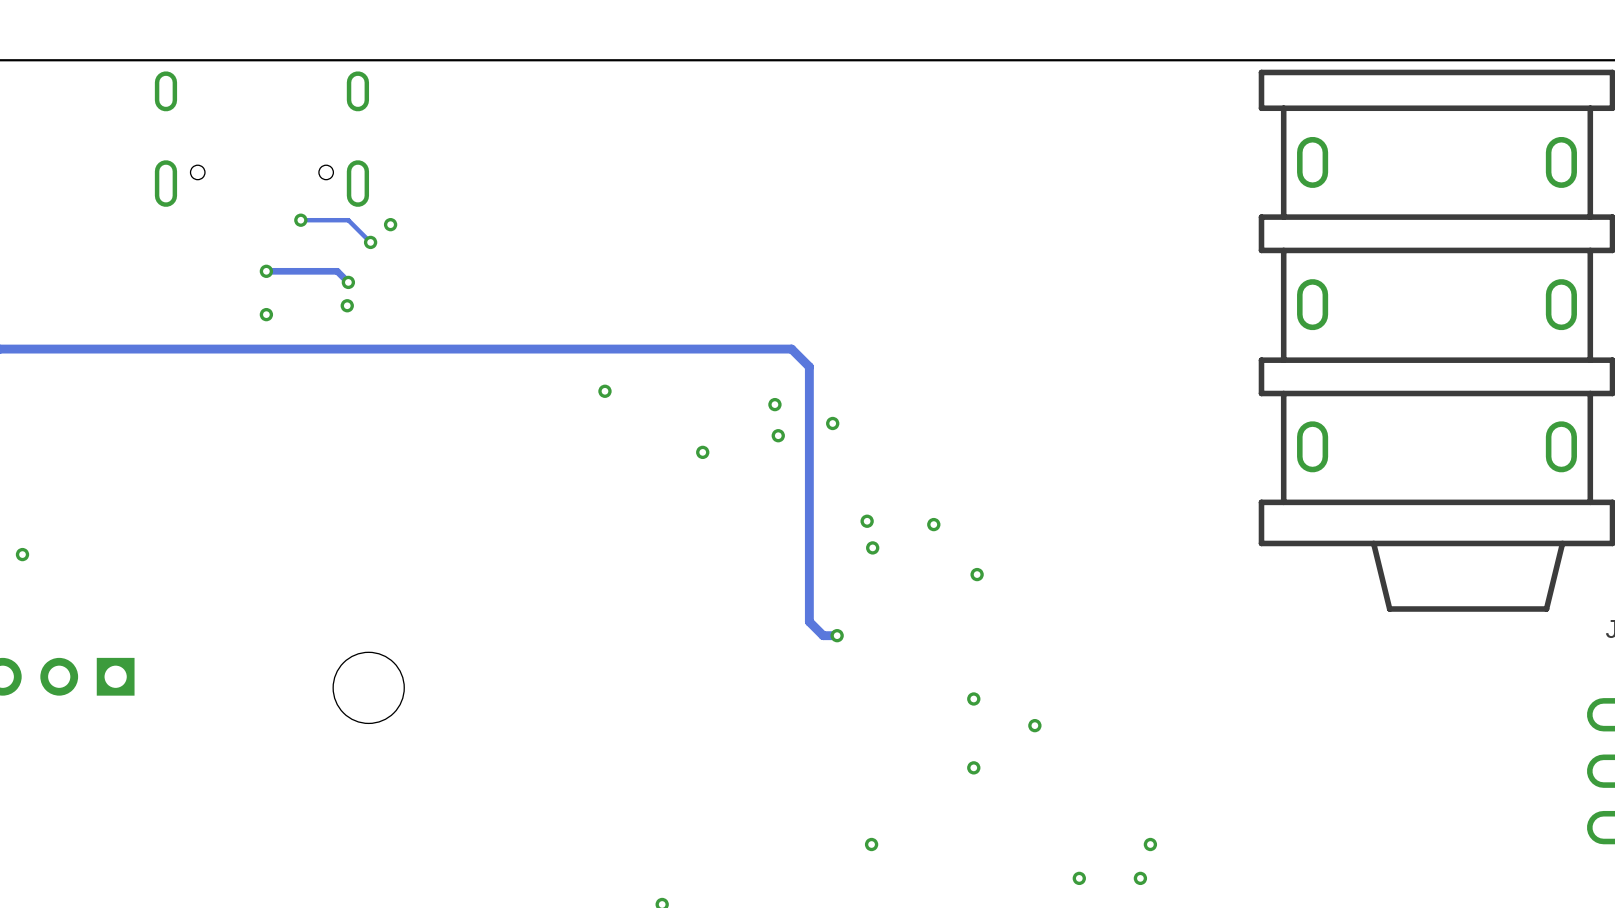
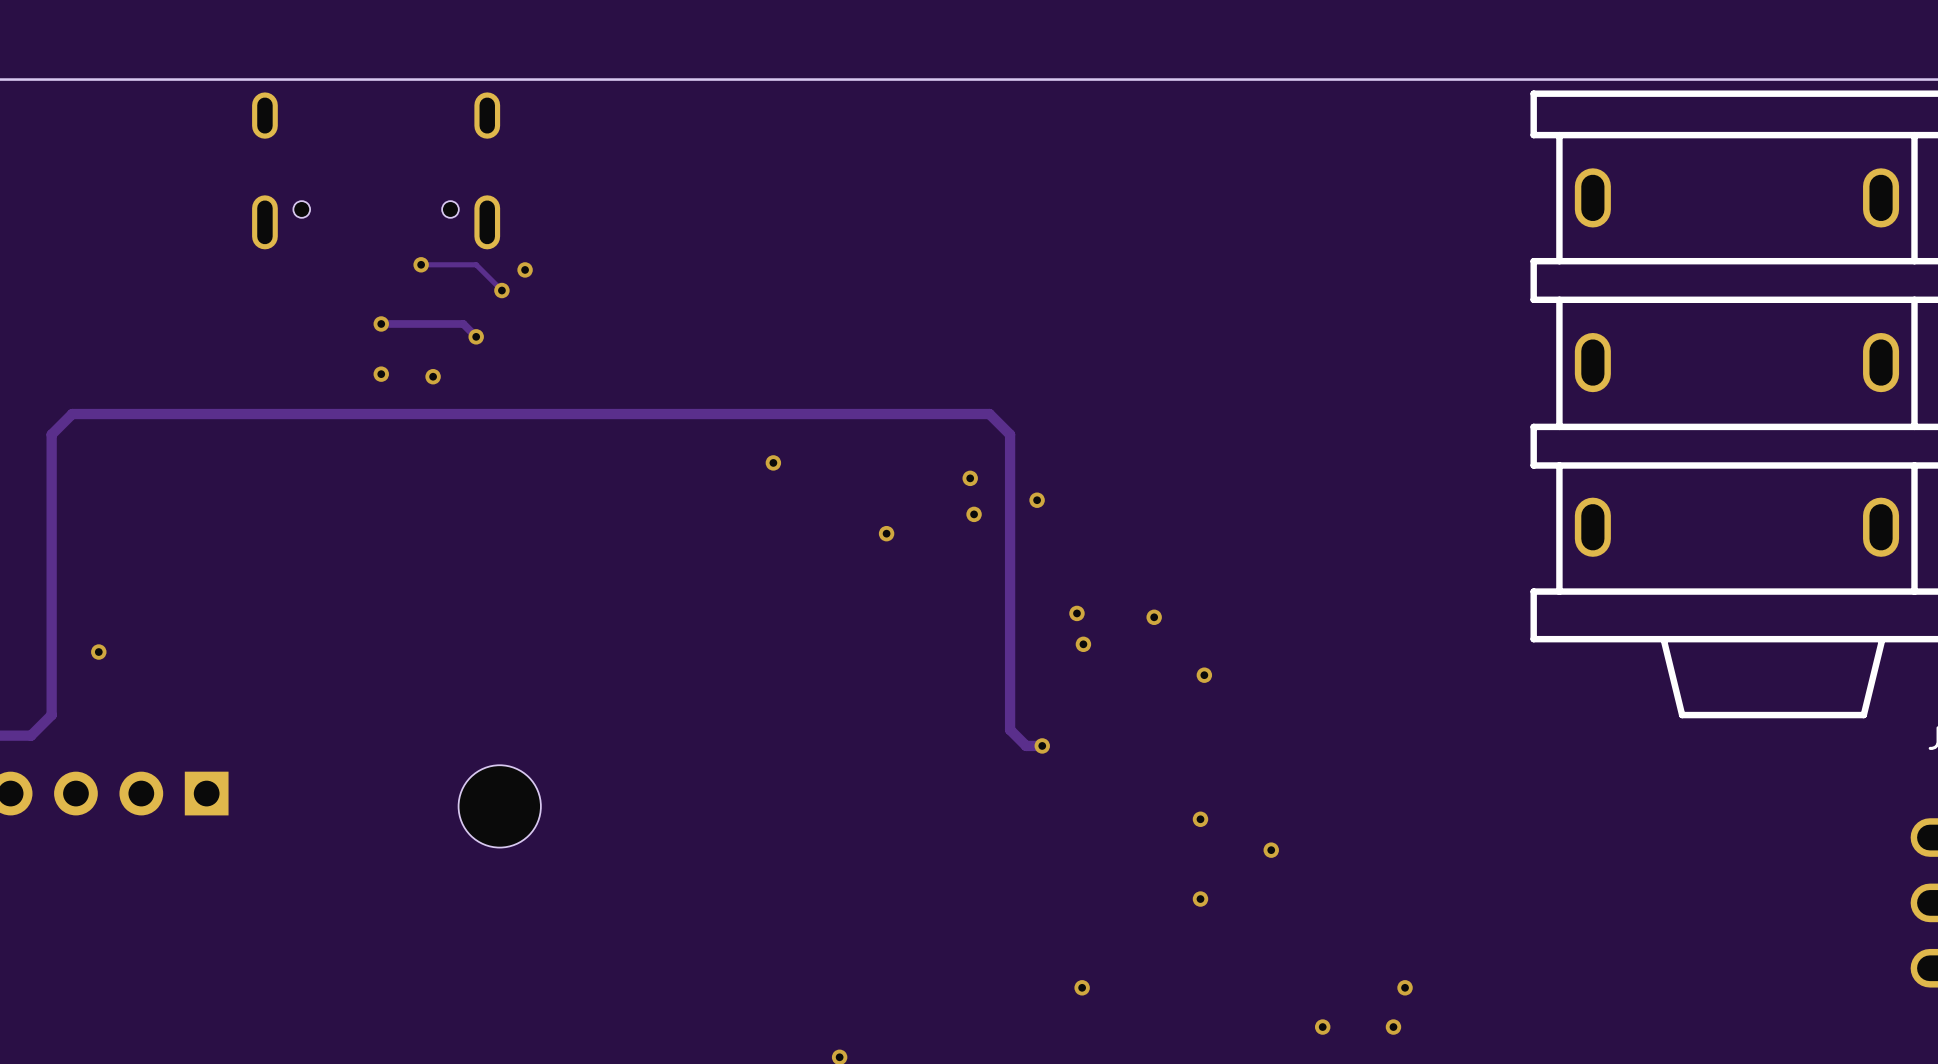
via position: (347, 305) -> (433, 376)

